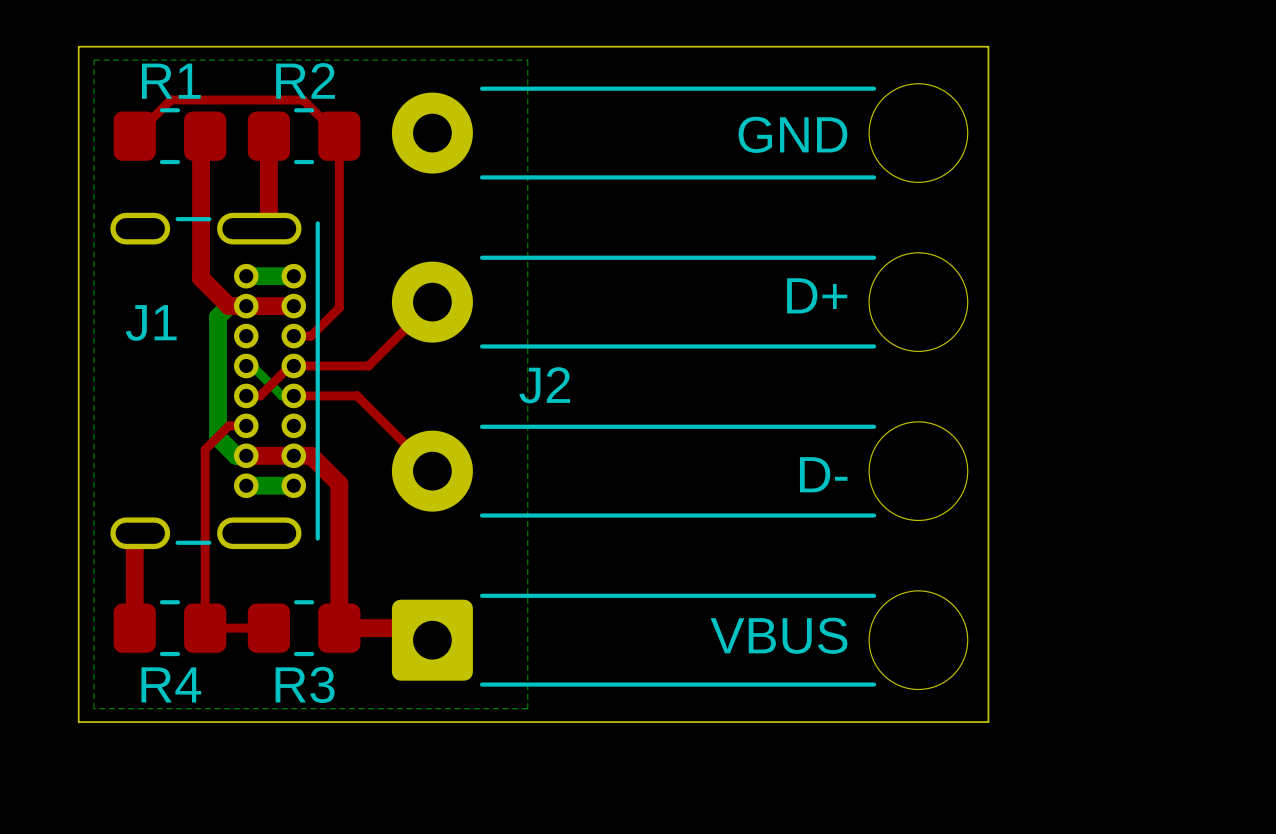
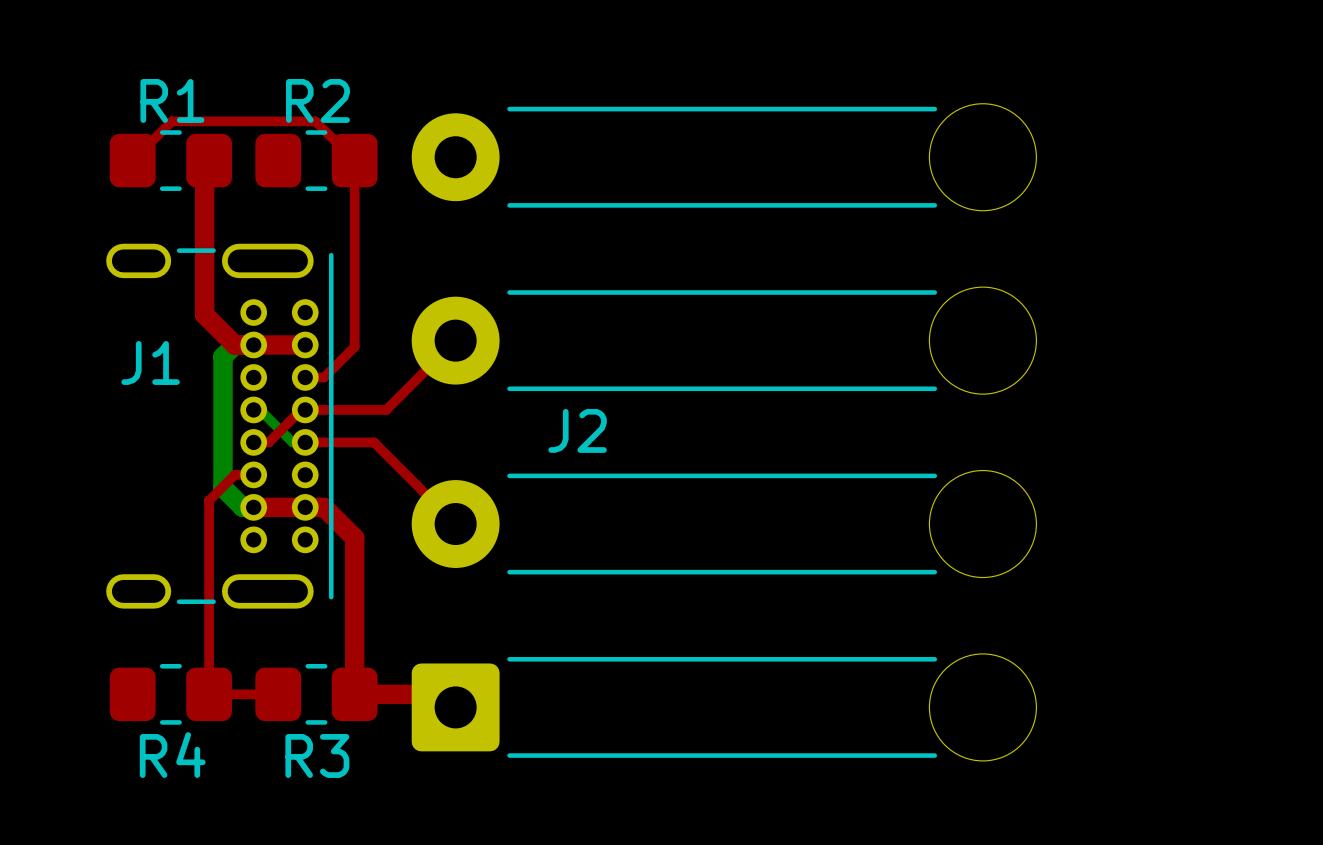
board edge: (78, 46) (988, 46) (988, 722) (78, 722) (78, 46) -> none
bottom zone outline: (93, 60) (527, 60) (527, 708) (93, 708) (93, 60) -> none
text: GND (792, 134) -> none
top track: (268, 136) (268, 219) (259, 228) -> none
bottom track: (246, 276) (293, 276) -> none
text: D+ (817, 295) -> none
text: D- (823, 474) -> none
bottom track: (246, 485) (293, 485) -> none
top track: (140, 533) (134, 538) (134, 628) -> none
text: VBUS (779, 635) -> none

